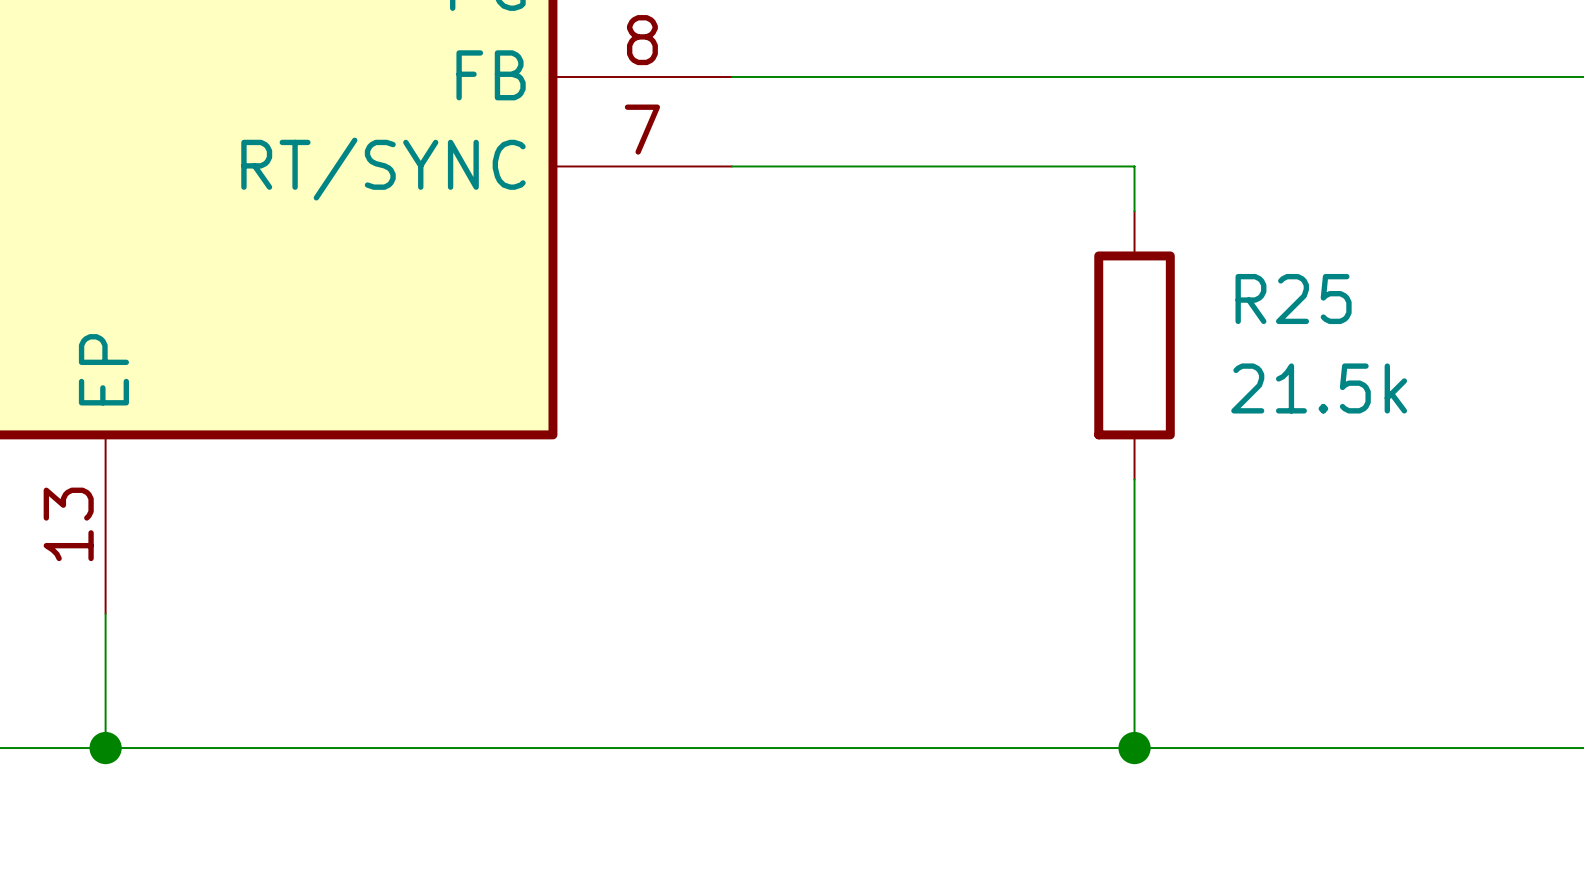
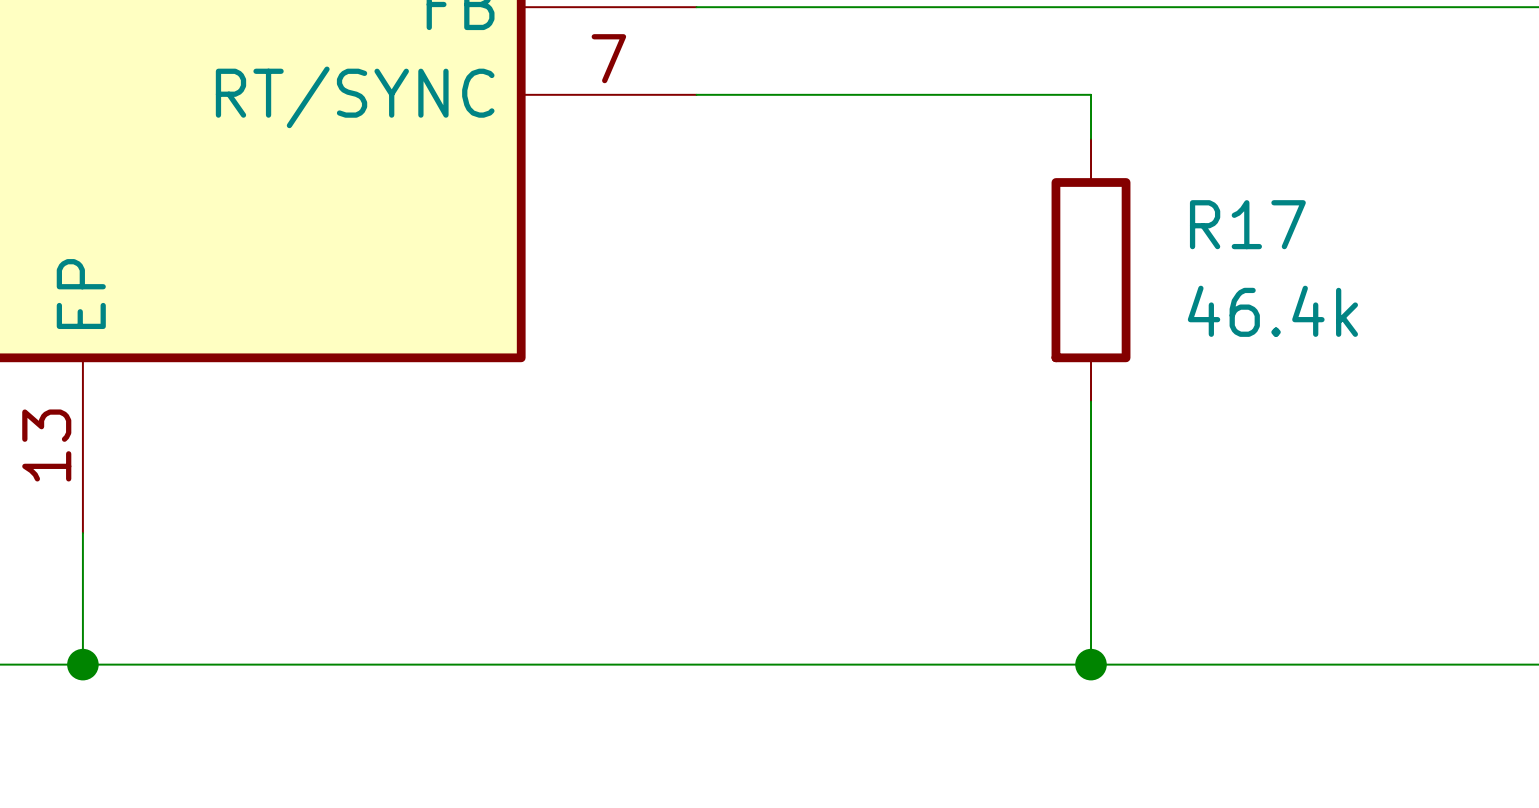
R25 name: R25 (1293, 299) -> R17 (1247, 224)
R25 value: 21.5k (1319, 388) -> 46.4k (1272, 311)

